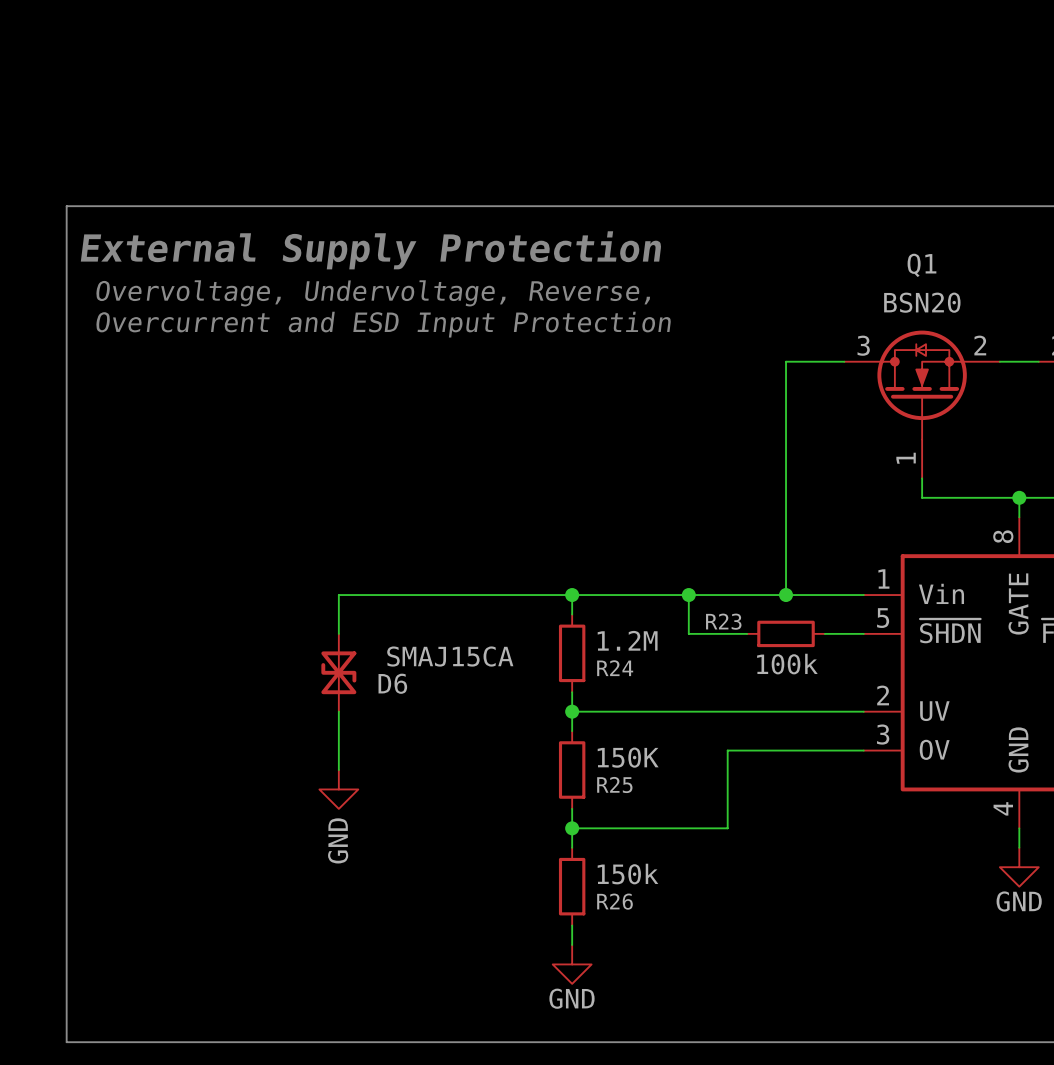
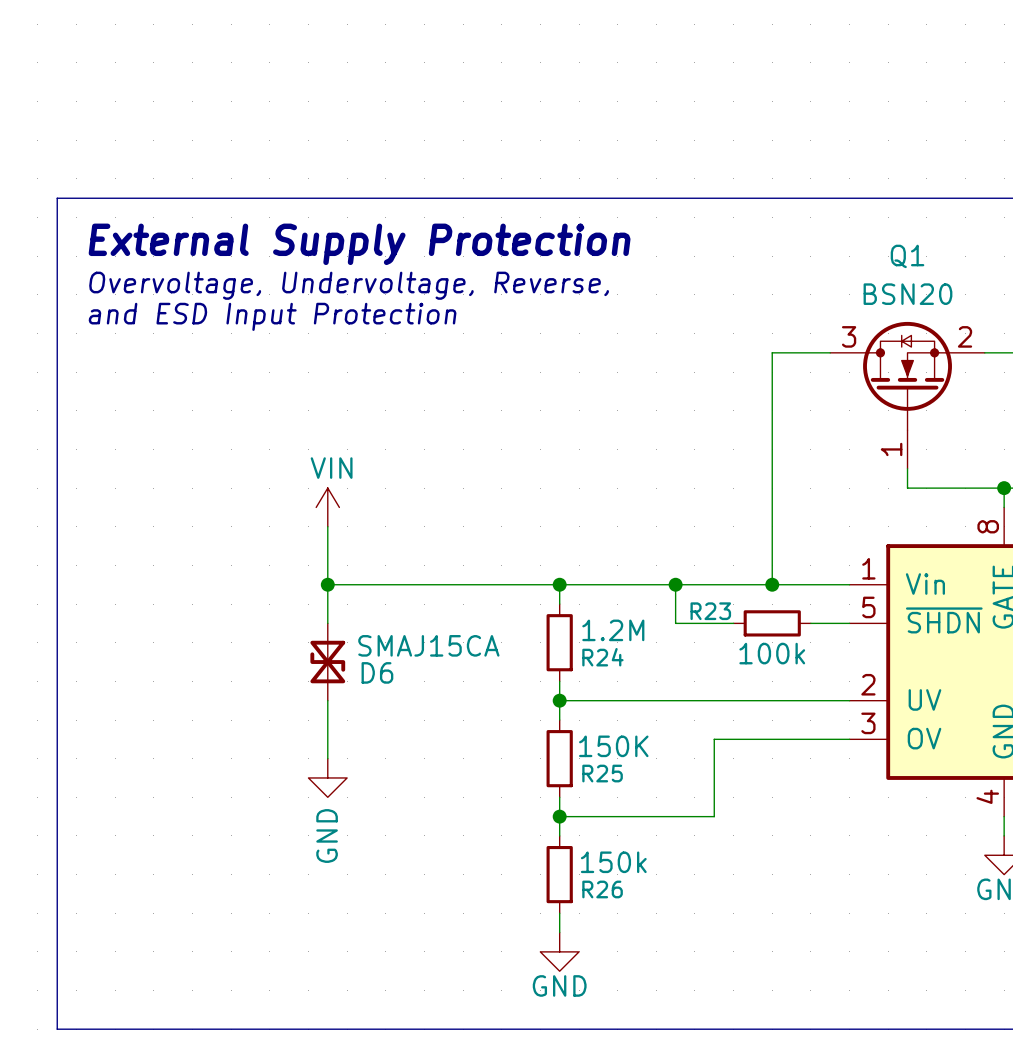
text: Overcurrent and ESD Input Protection (383, 324) -> and ESD Input Protection (272, 316)
power symbol: none -> VIN (327, 507)
wire: none -> (327, 526) (327, 584)
junction: none -> (327, 584)

